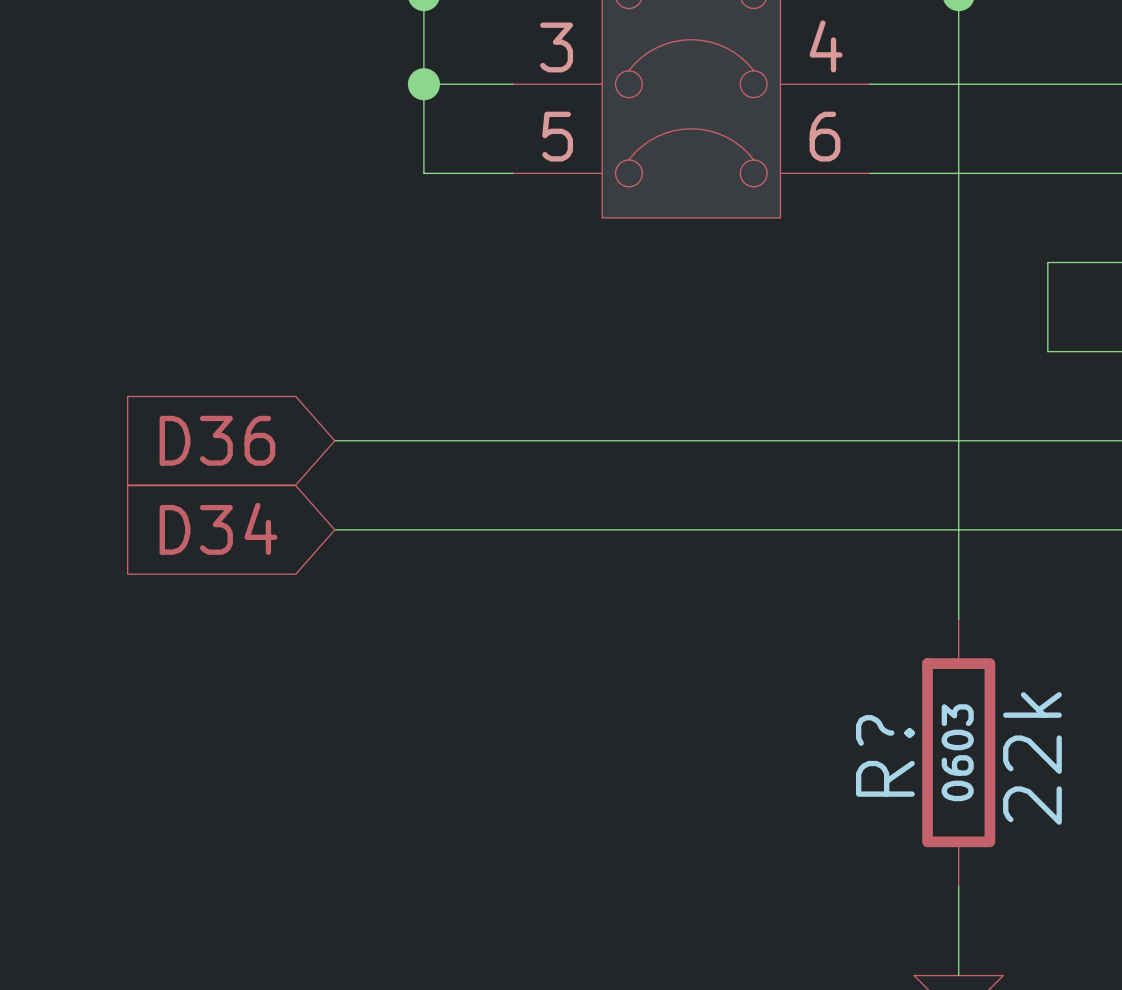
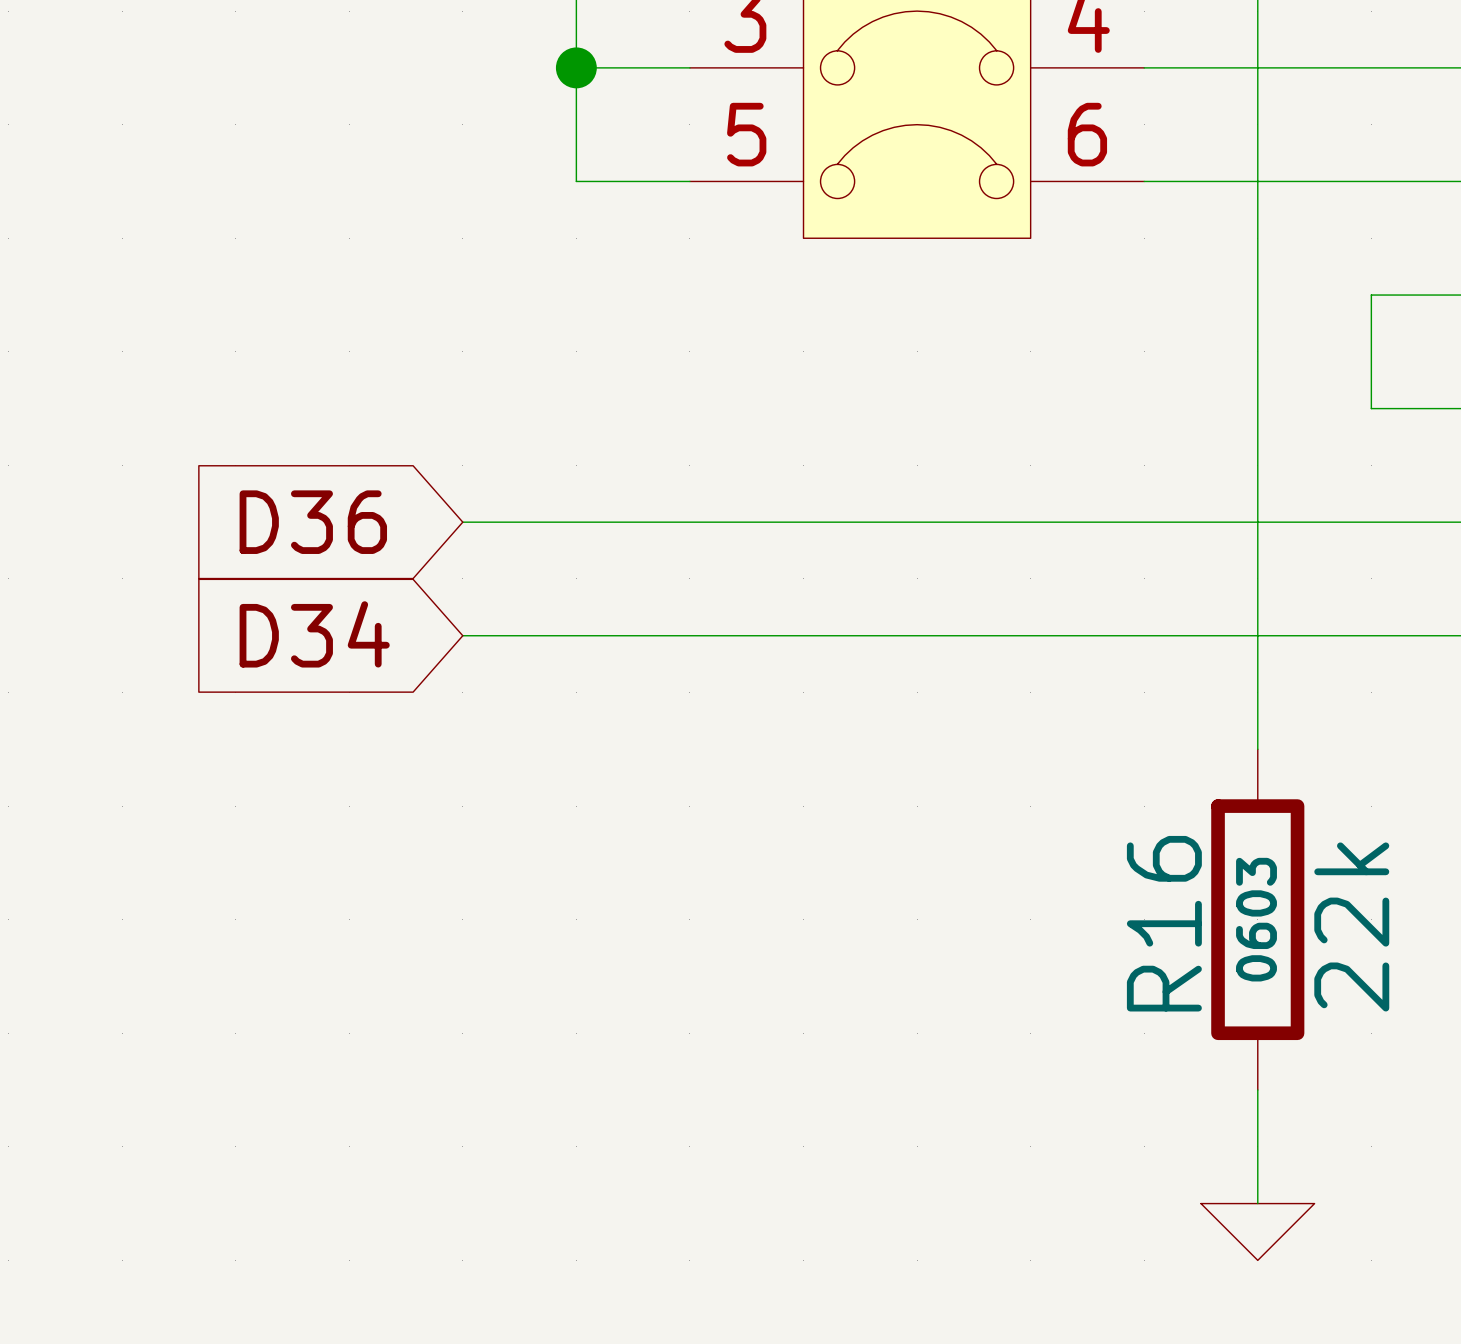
R? name: R? (885, 755) -> R16 (1164, 923)

